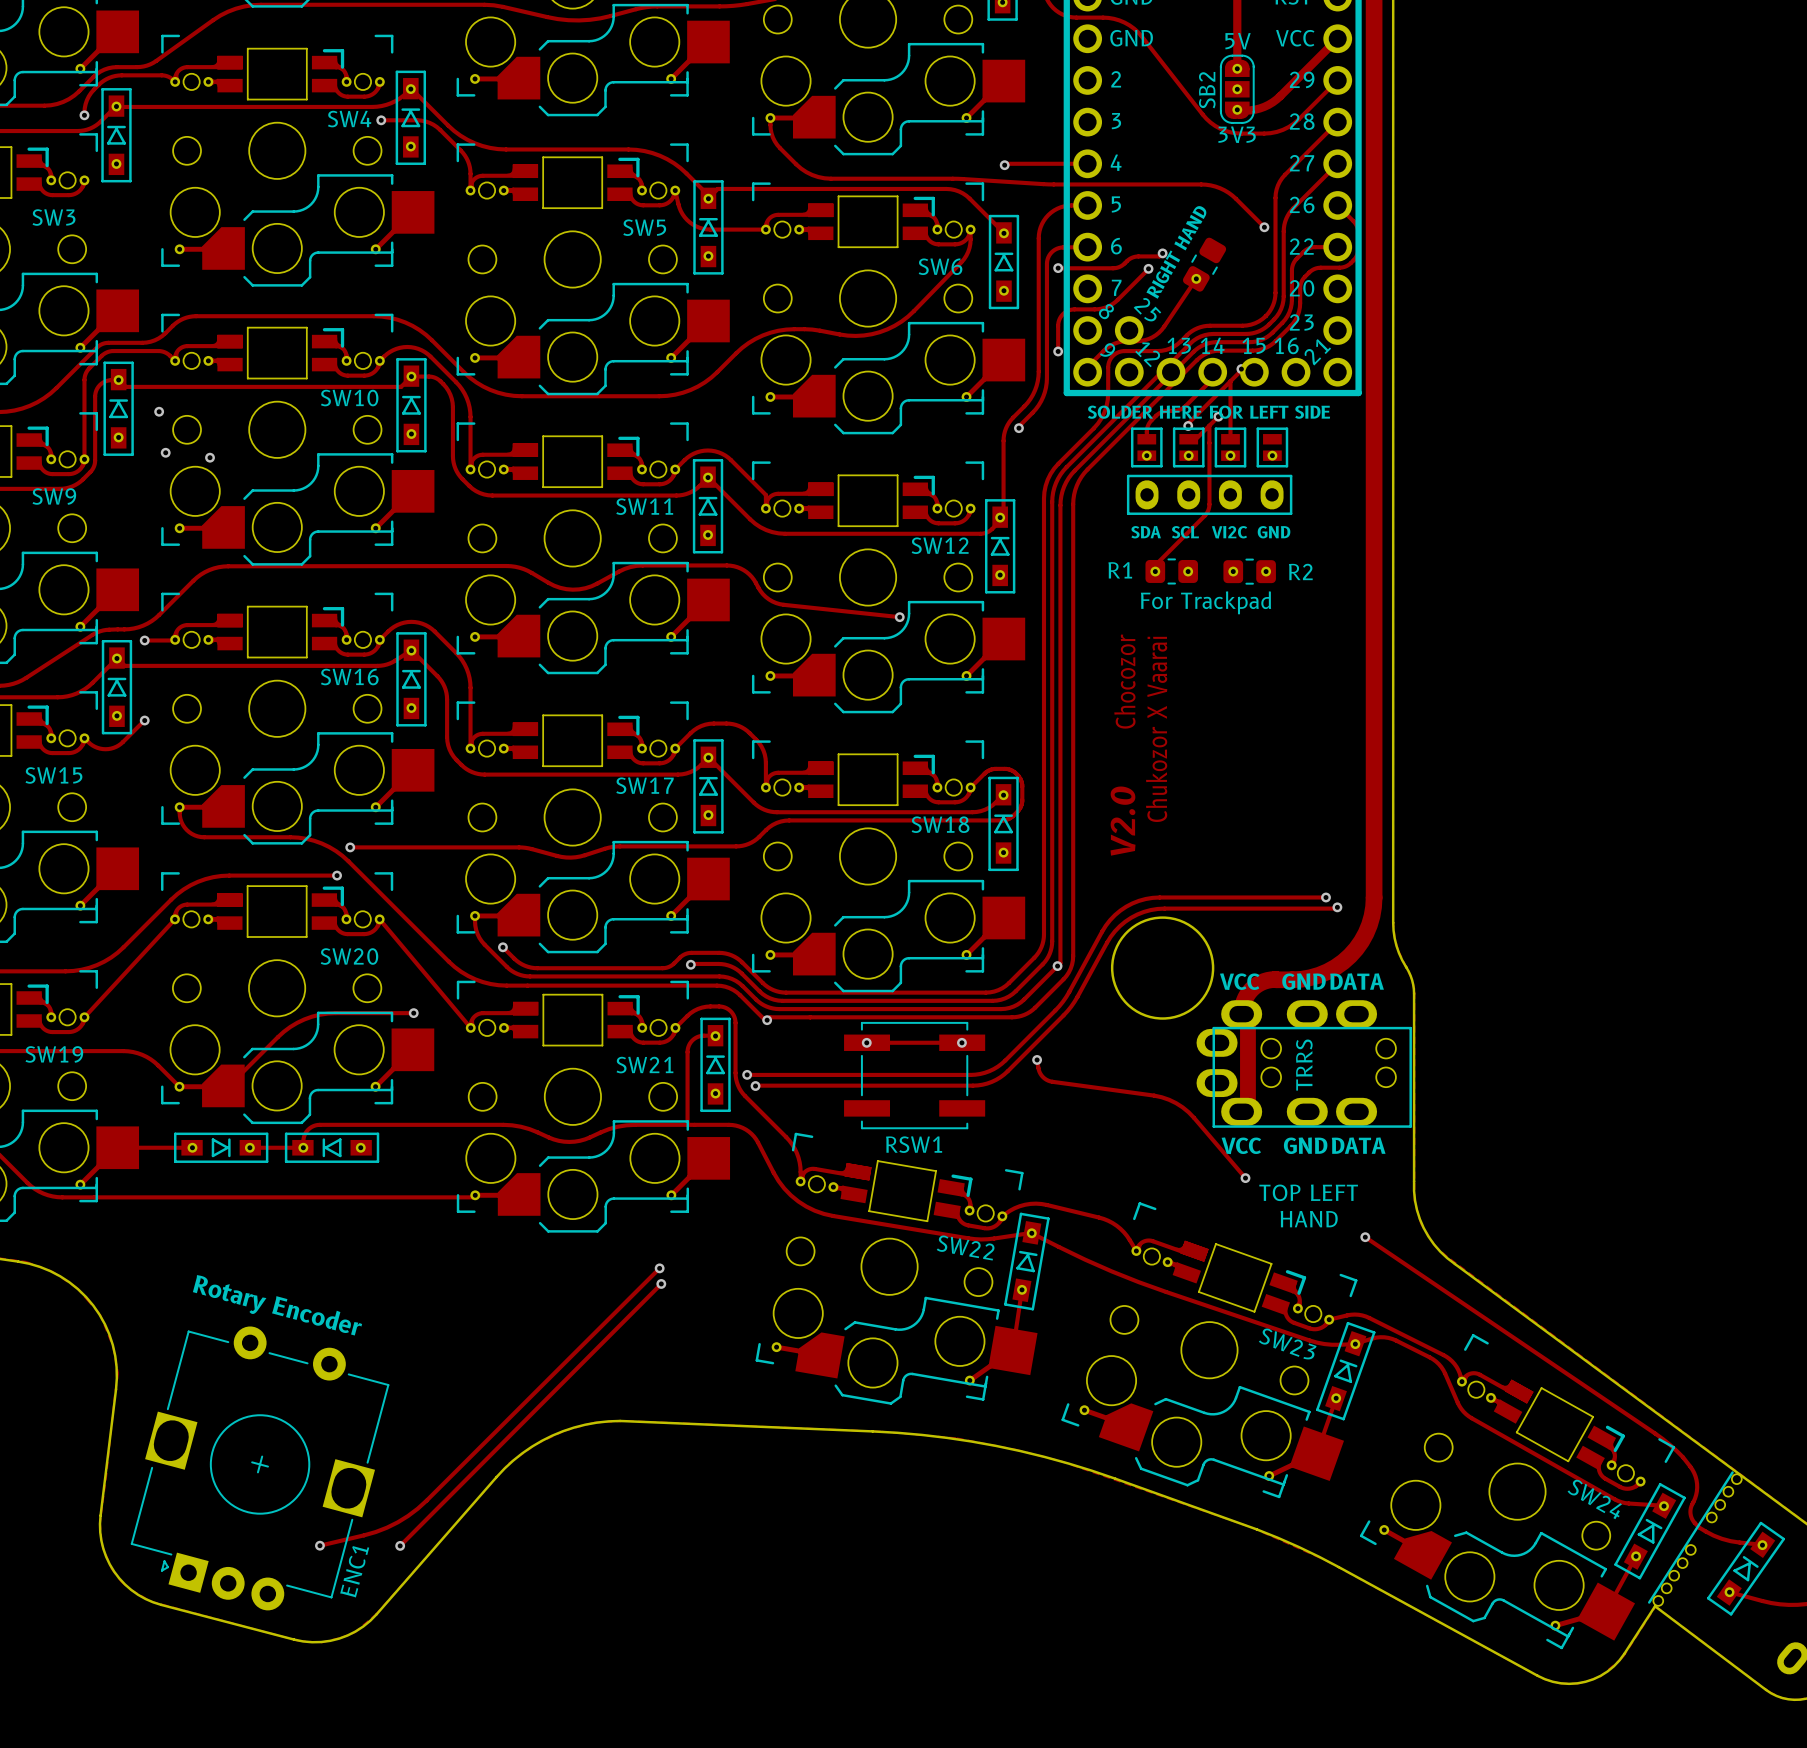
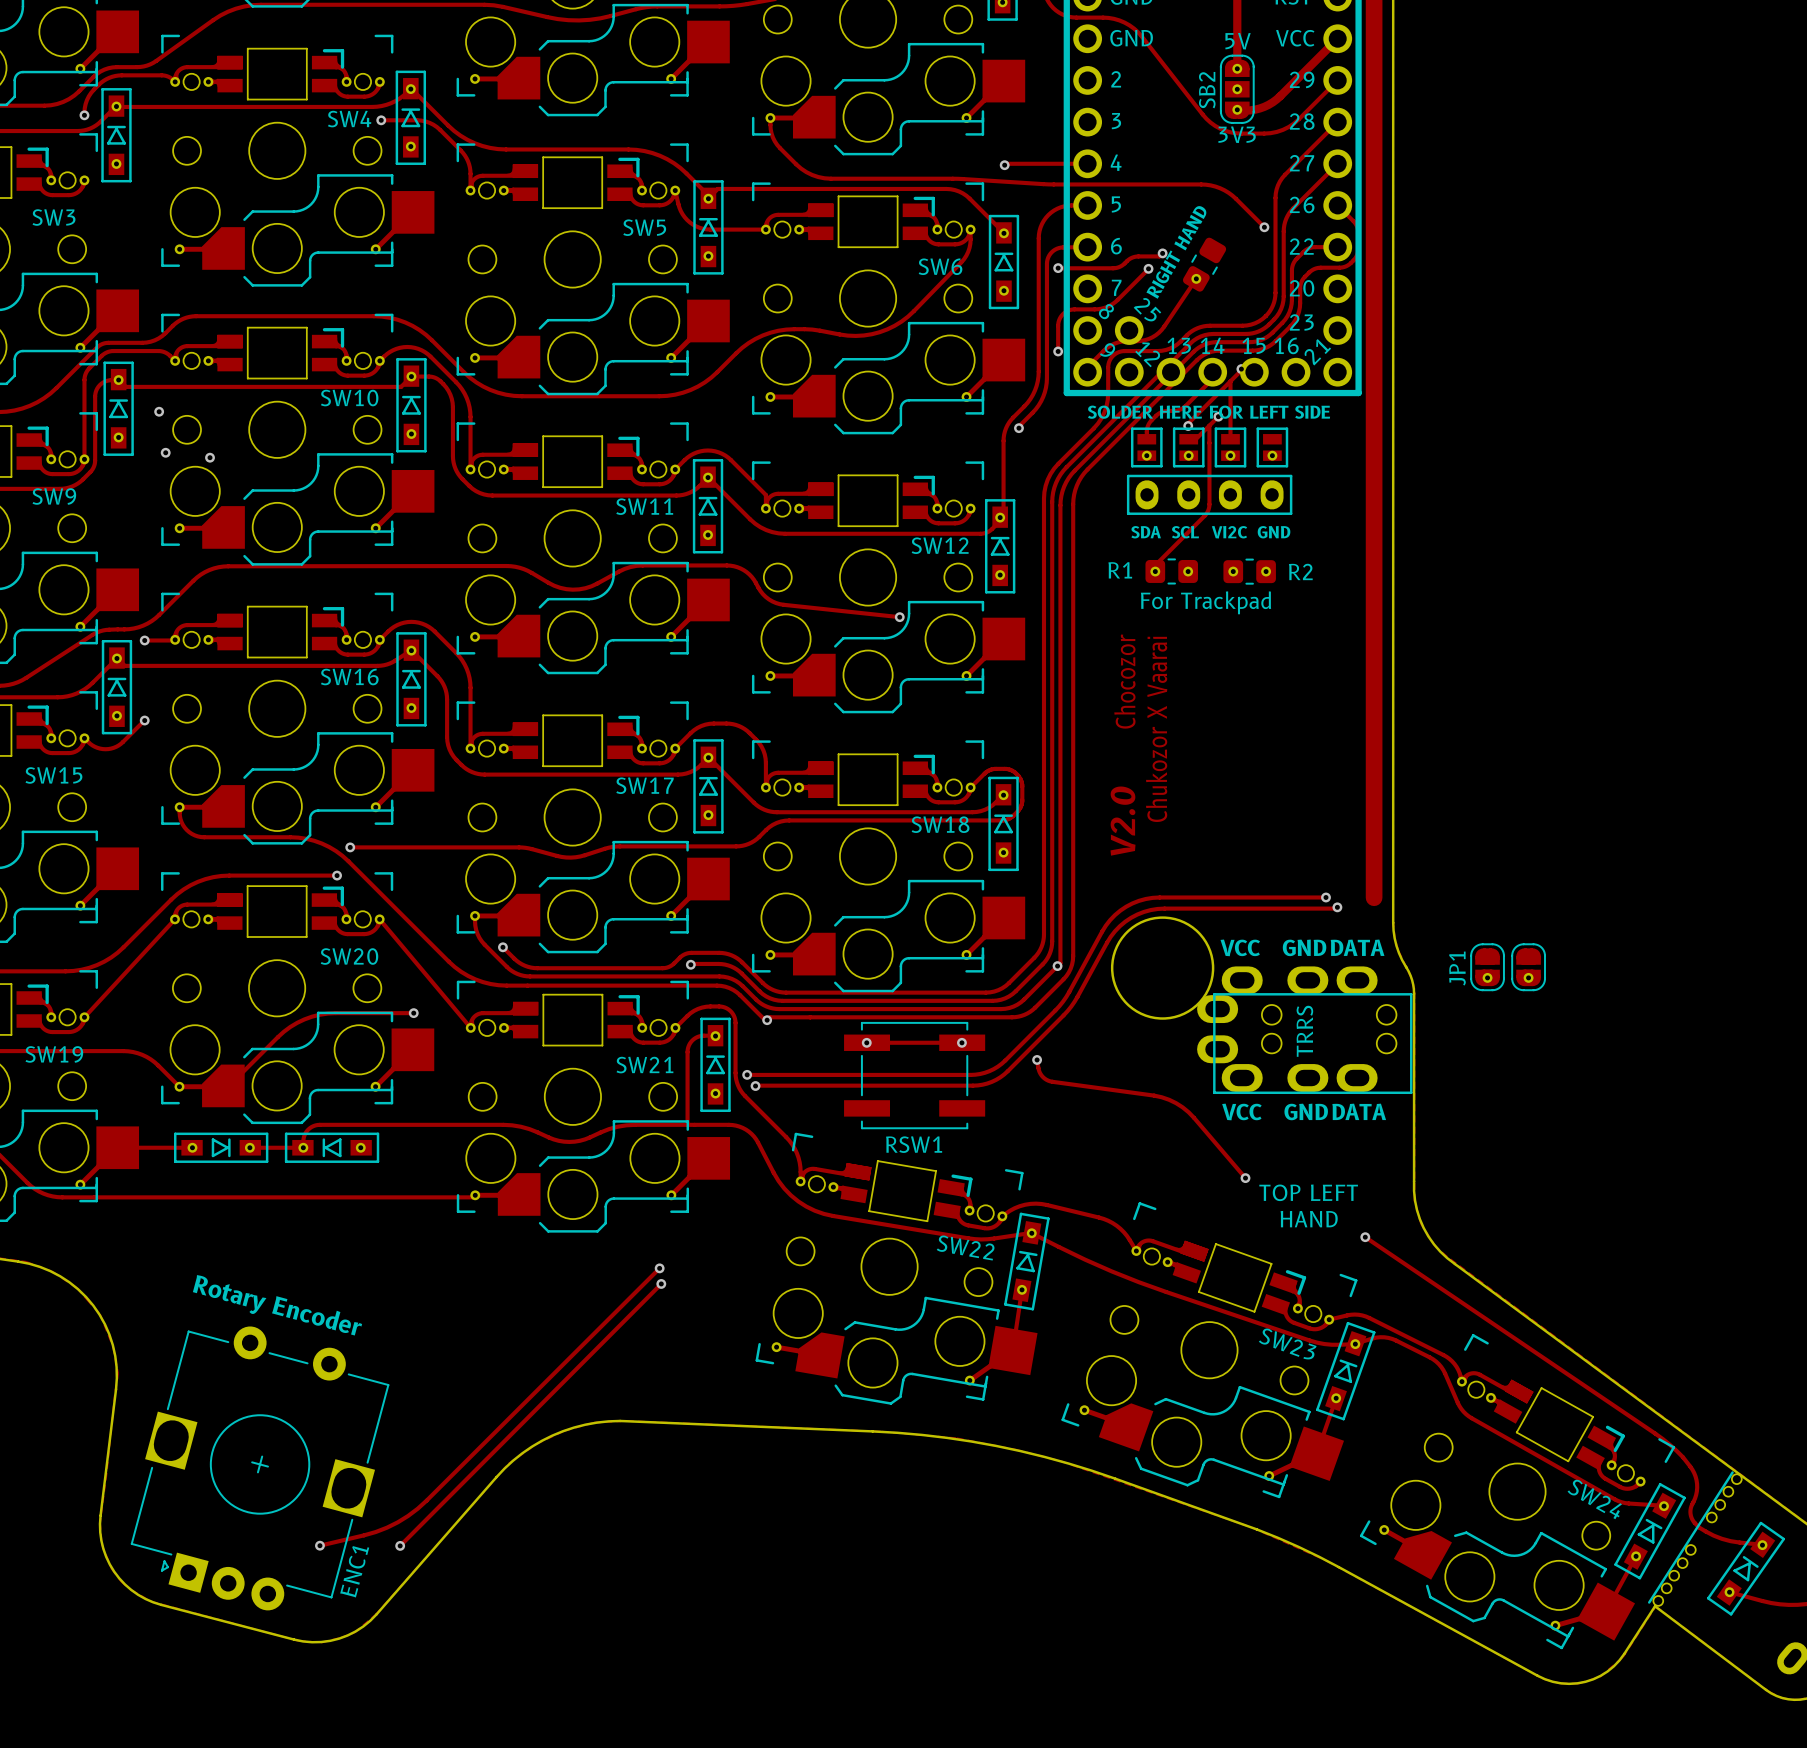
track: (1374, 897) (1372, 915) (1365, 933) (1356, 948) (1343, 961) (1327, 971) (1310, 977) (1264, 981) (1254, 986) (1247, 994) (1241, 1014) (1247, 1020) (1247, 1105) (1241, 1111) -> none
JP1: none -> (1508, 967)
part position: (1304, 1063) -> (1304, 1030)

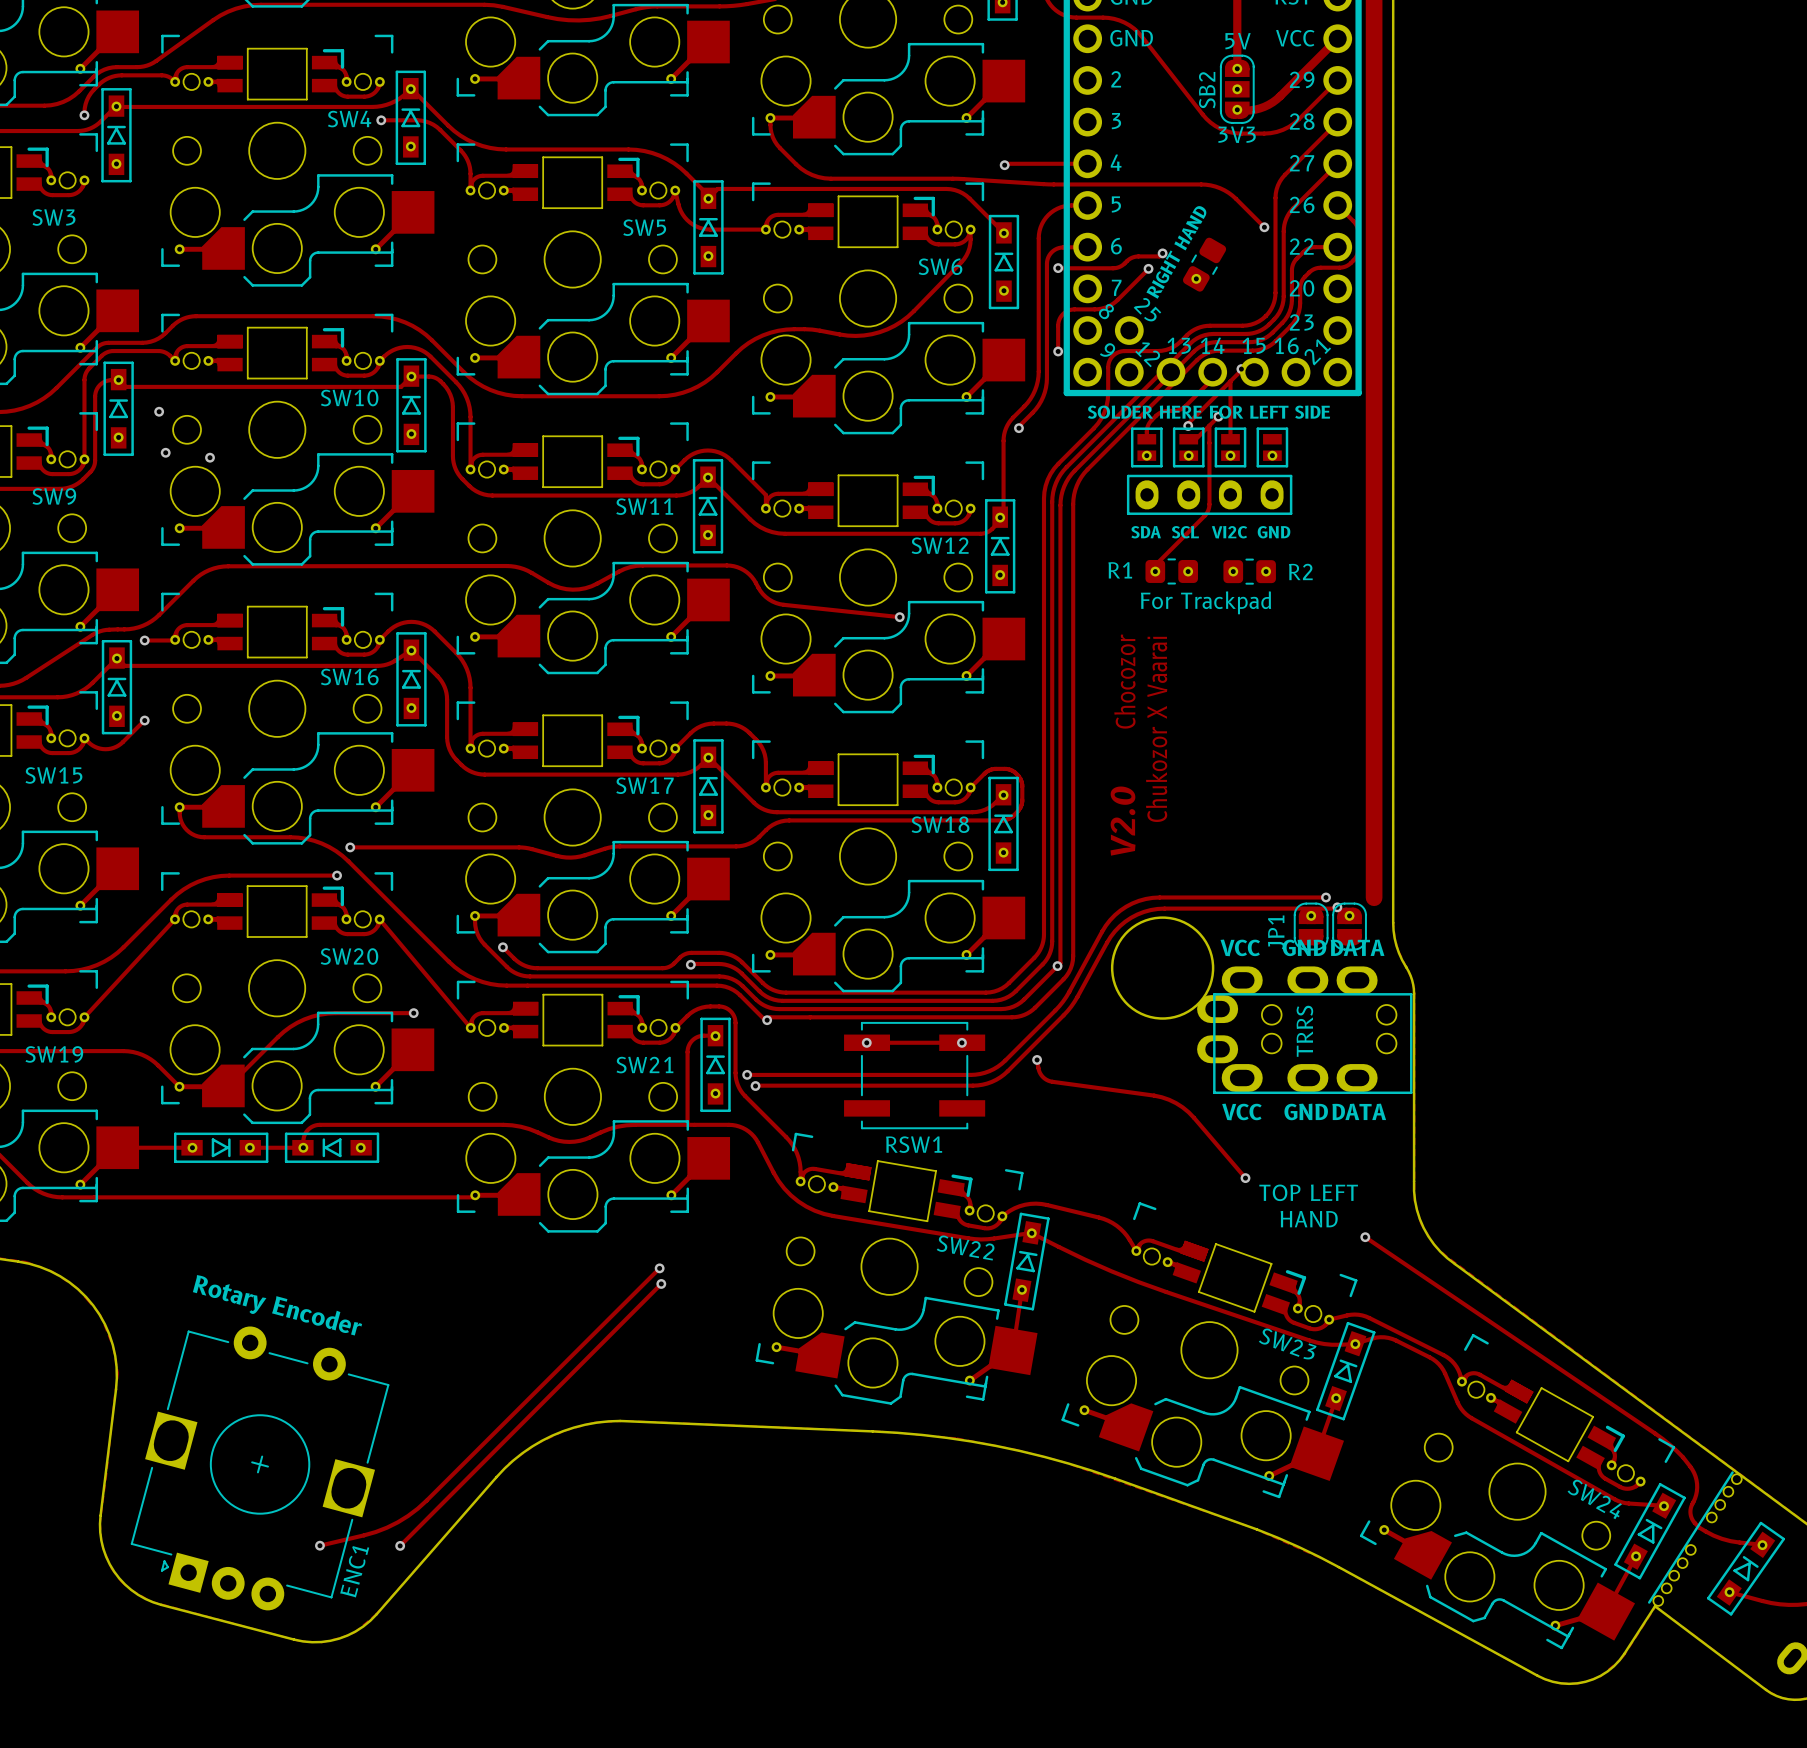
track: (1196, 278) (1158, 332) (1144, 340) (1122, 341) (1110, 345) (1087, 366) (1087, 372) -> none
JP1 footprint: [1470, 943, 1546, 992] -> [1293, 902, 1367, 951]

